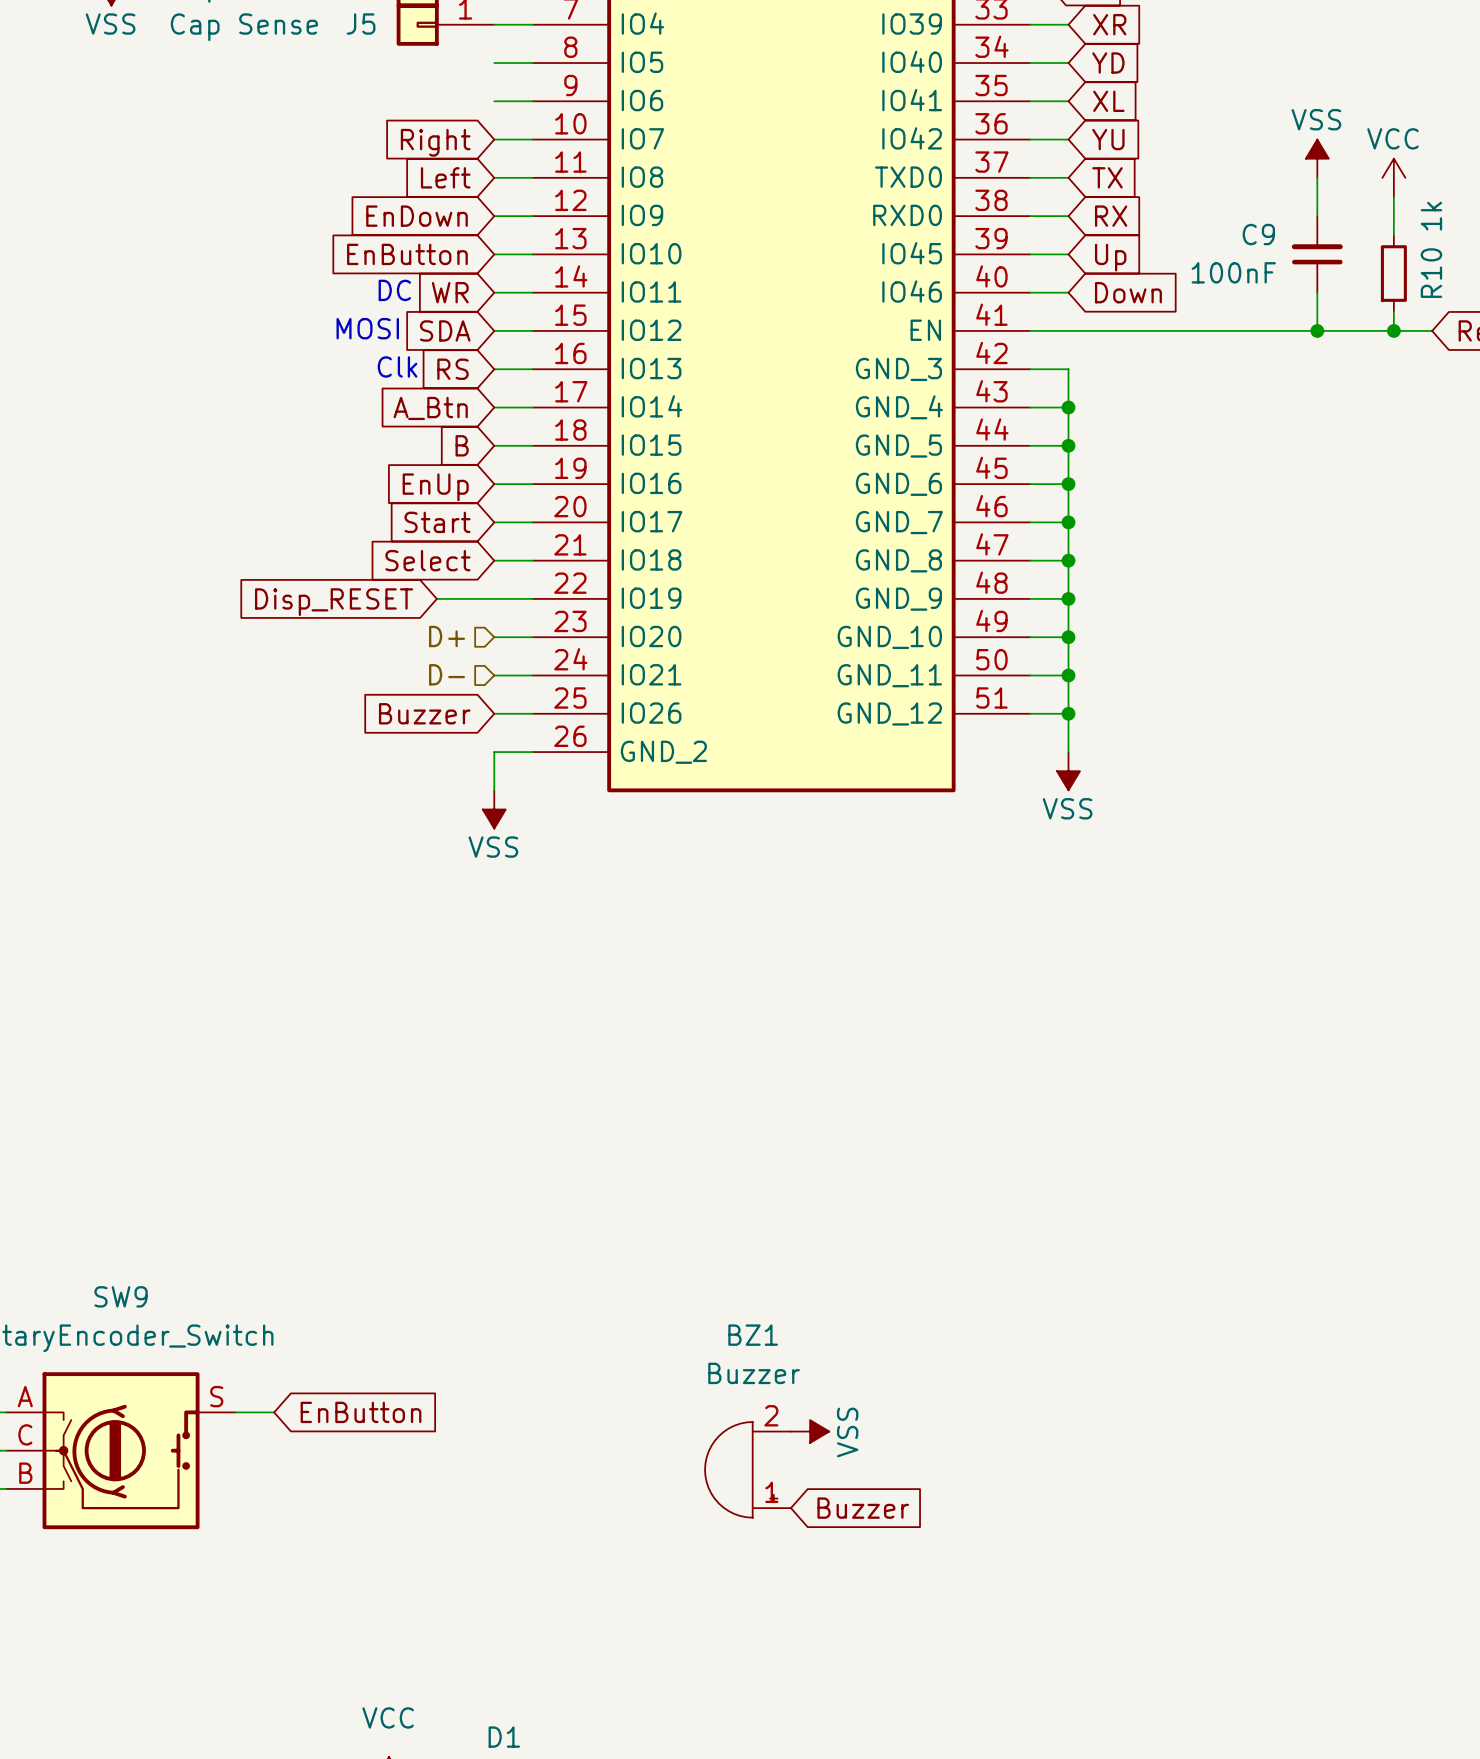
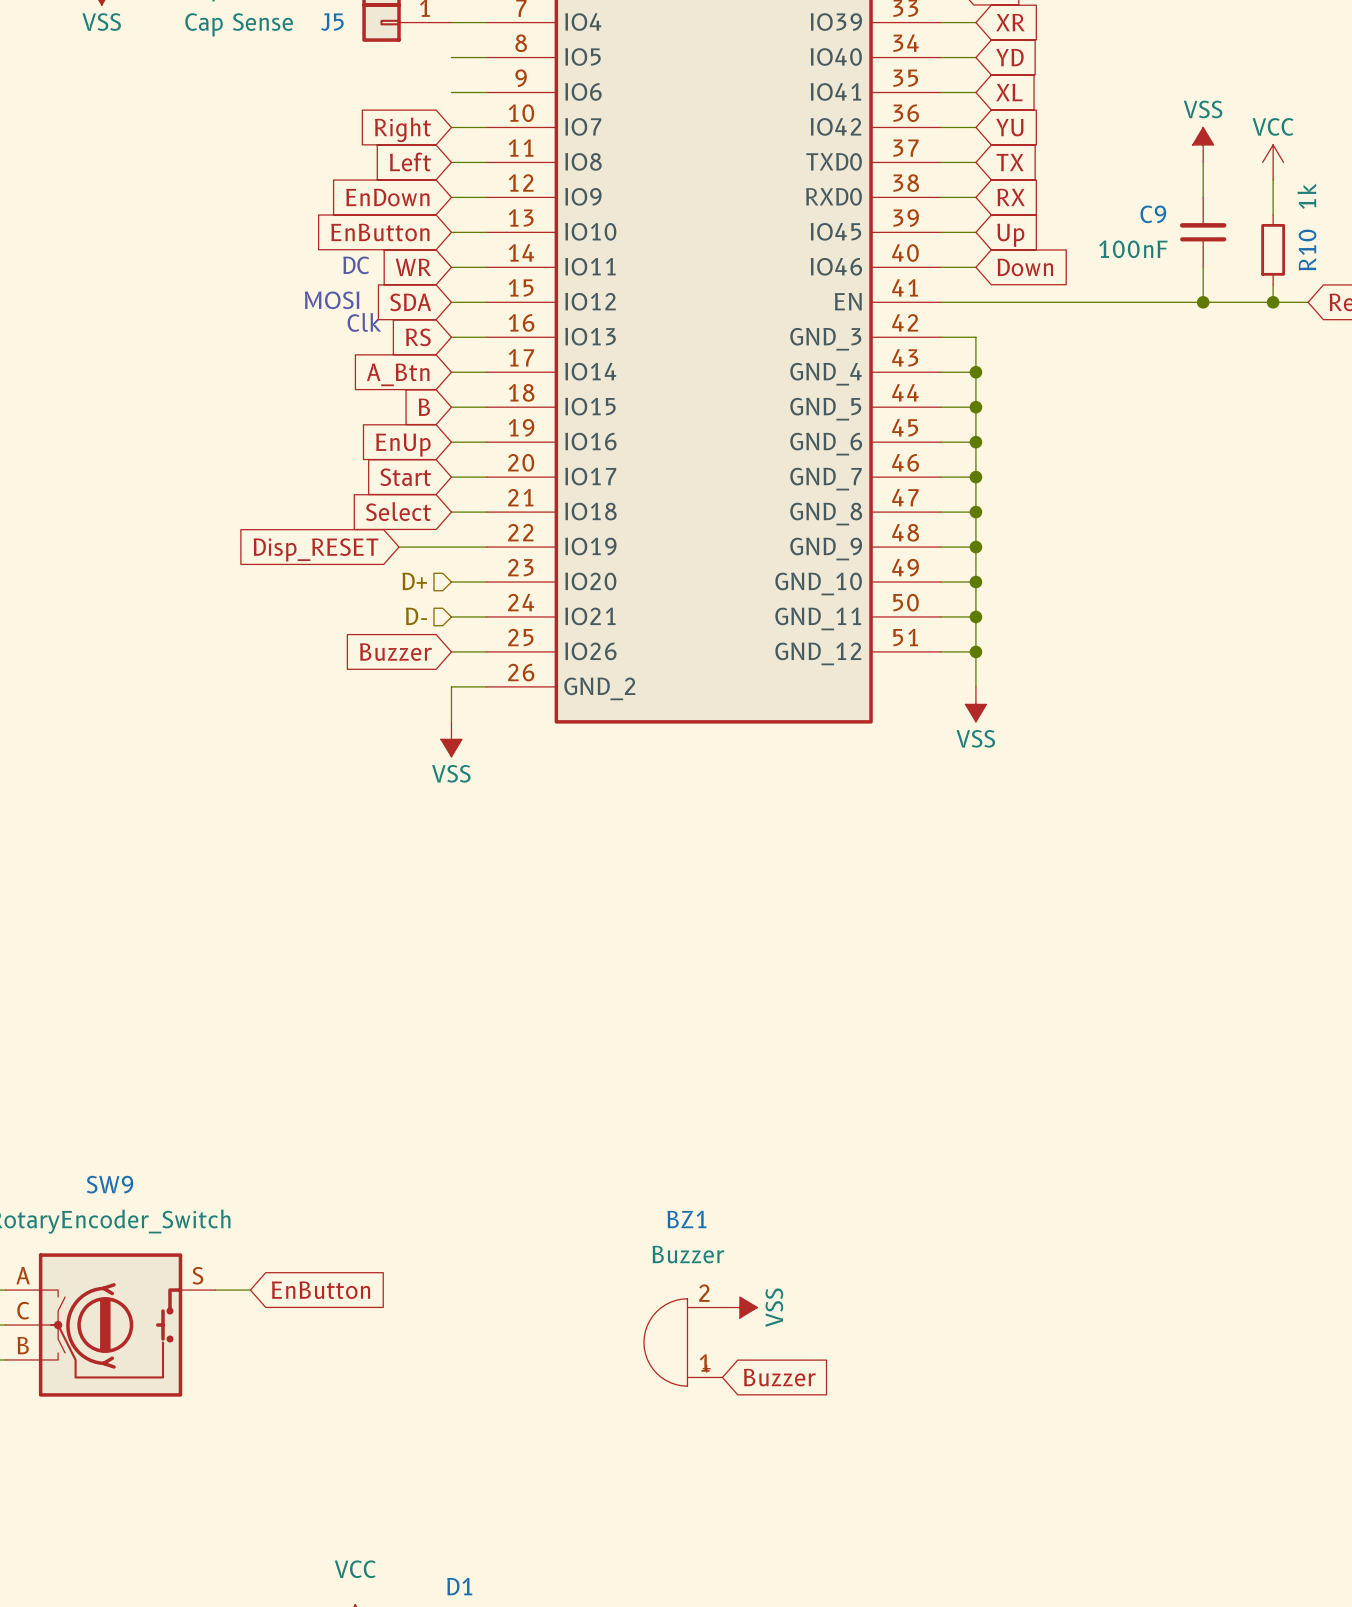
text position: Clk (397, 366) -> Clk (364, 322)

